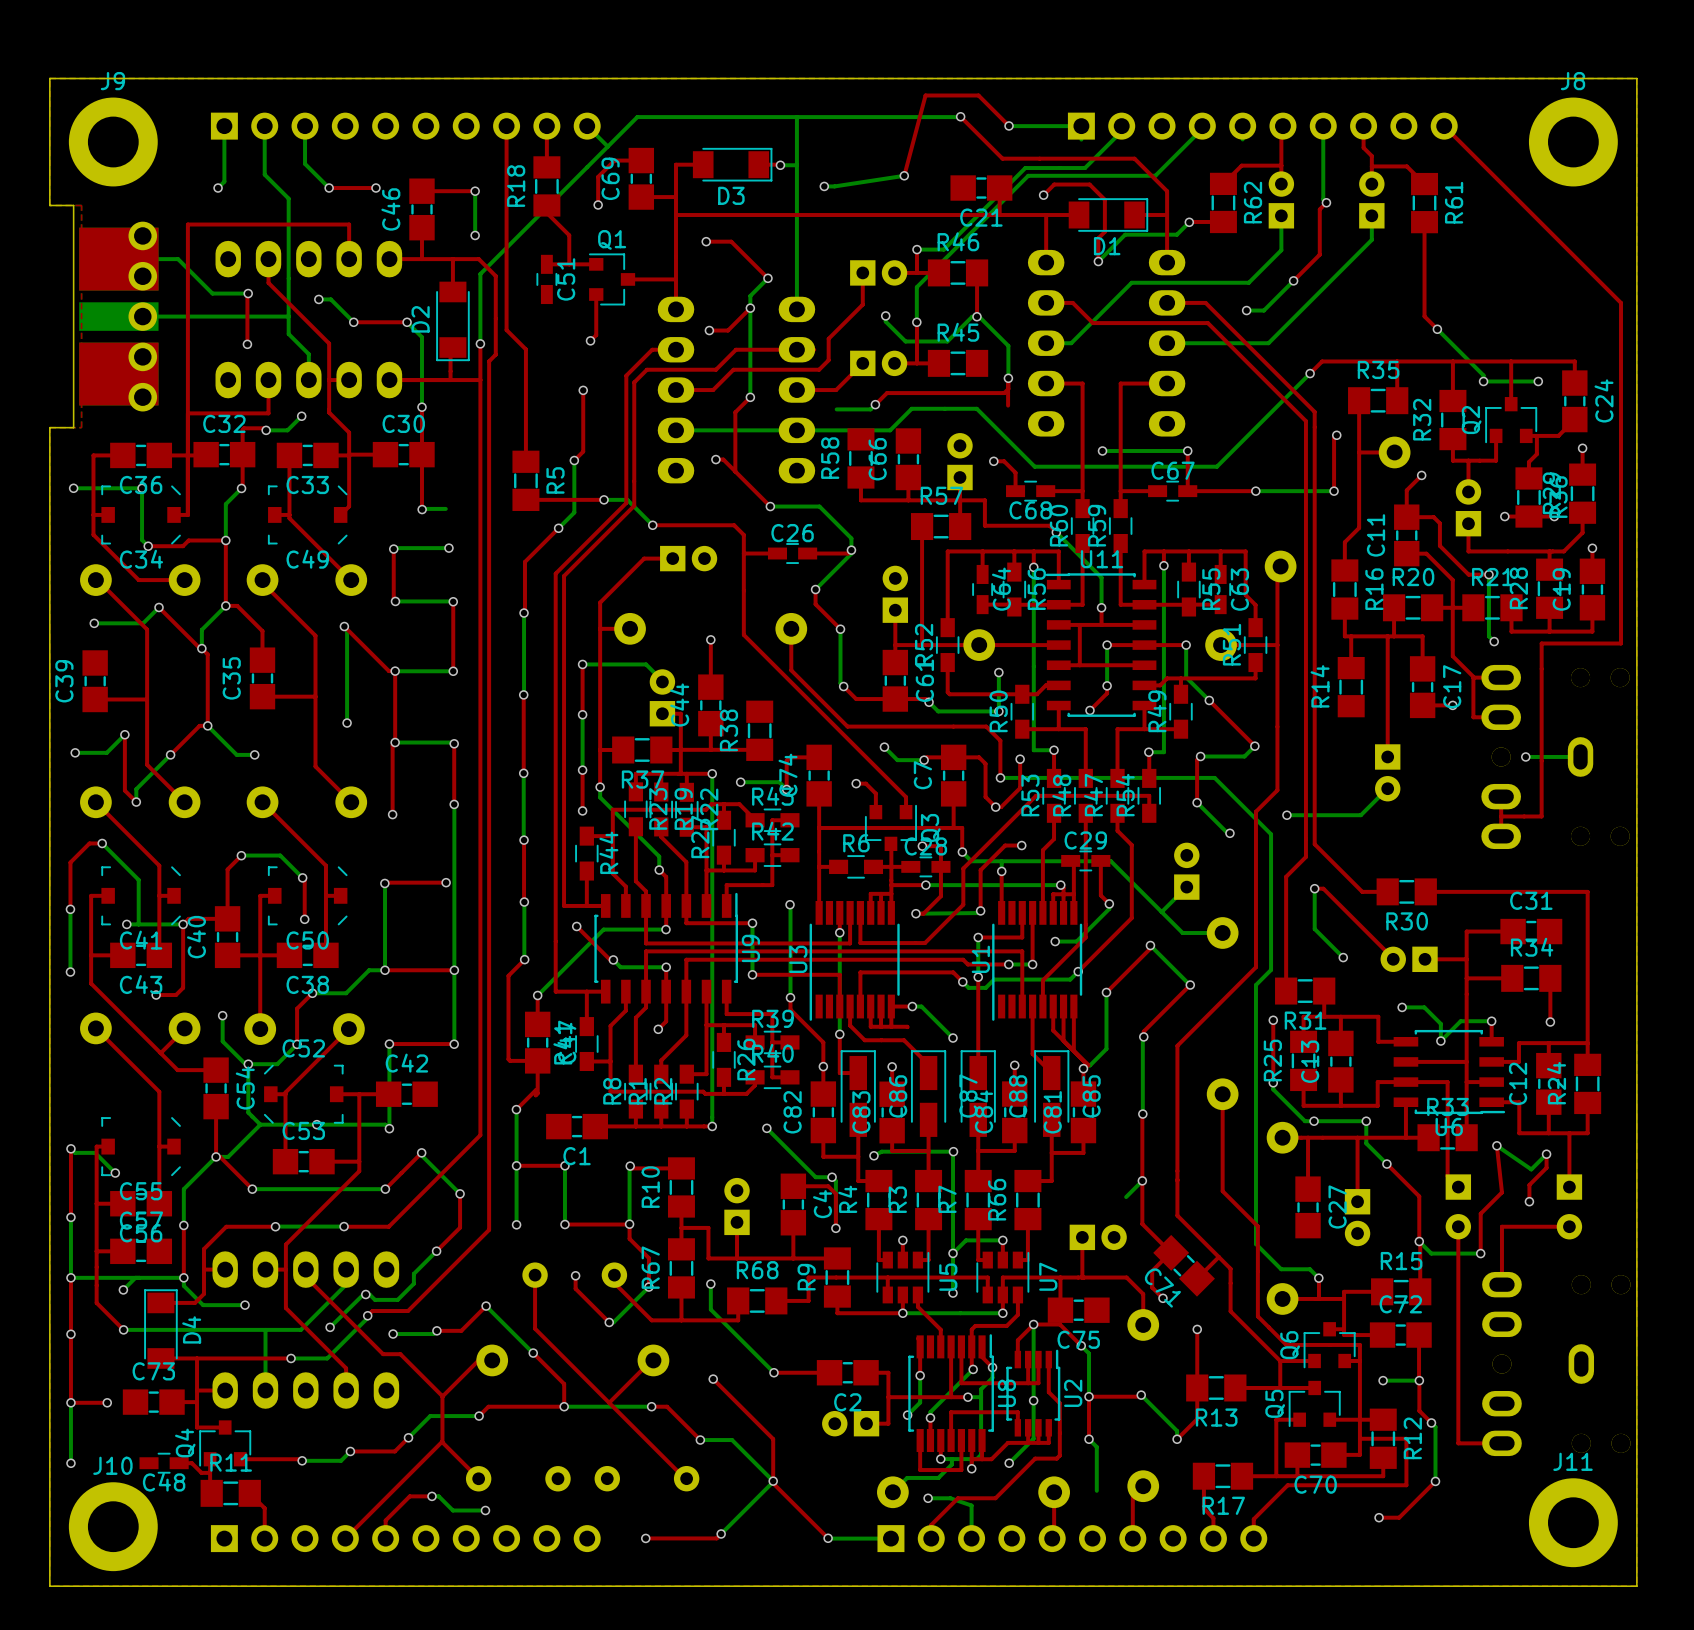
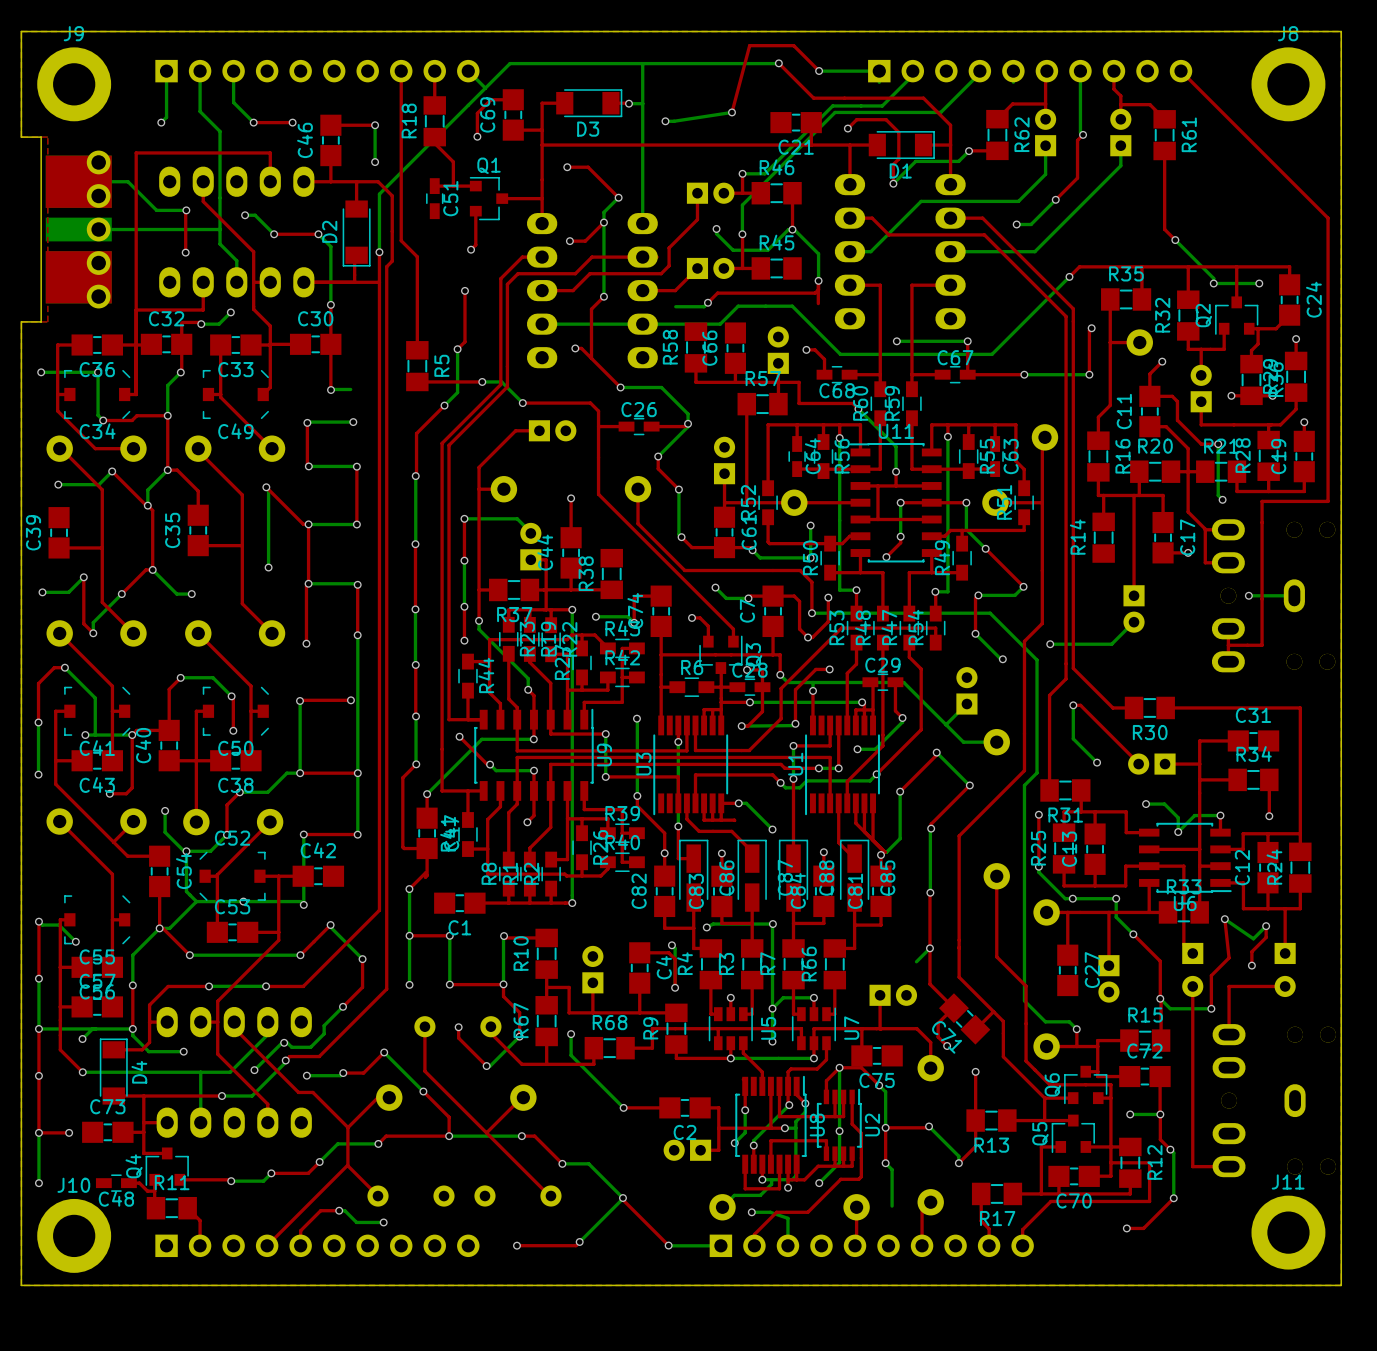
bottom track: (766, 1128) (815, 1177) (832, 1177) -> none
via: (766, 1128) -> none
top track: (713, 1379) (773, 1439) (773, 1481) -> none
via: (713, 1379) -> none

